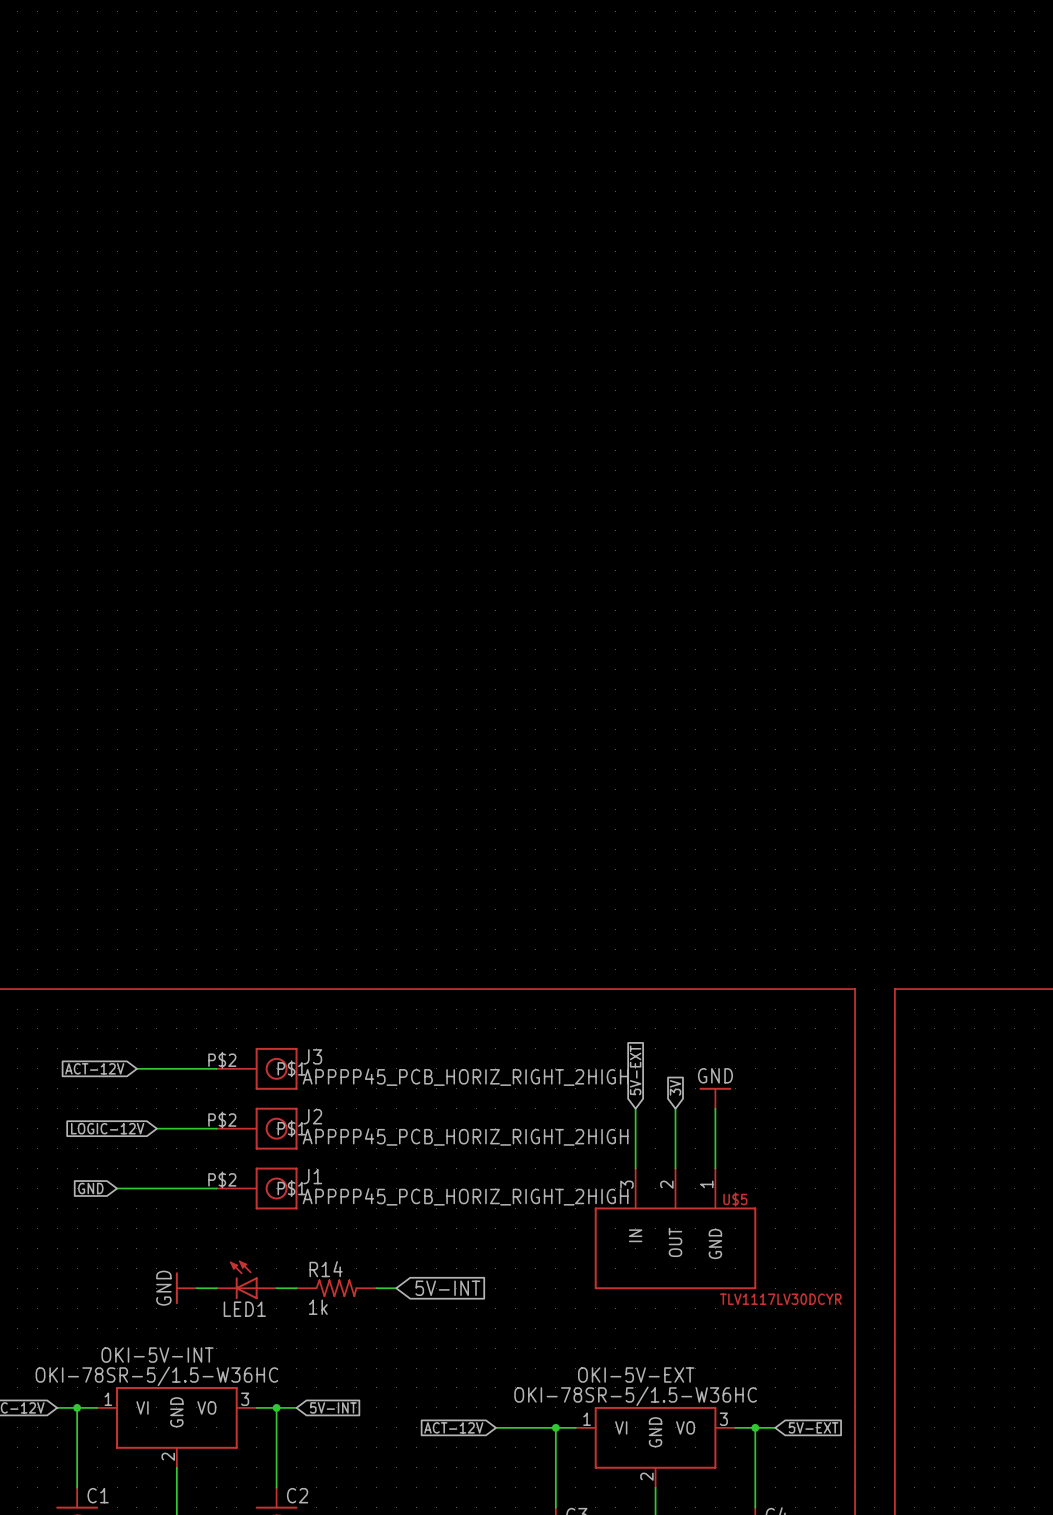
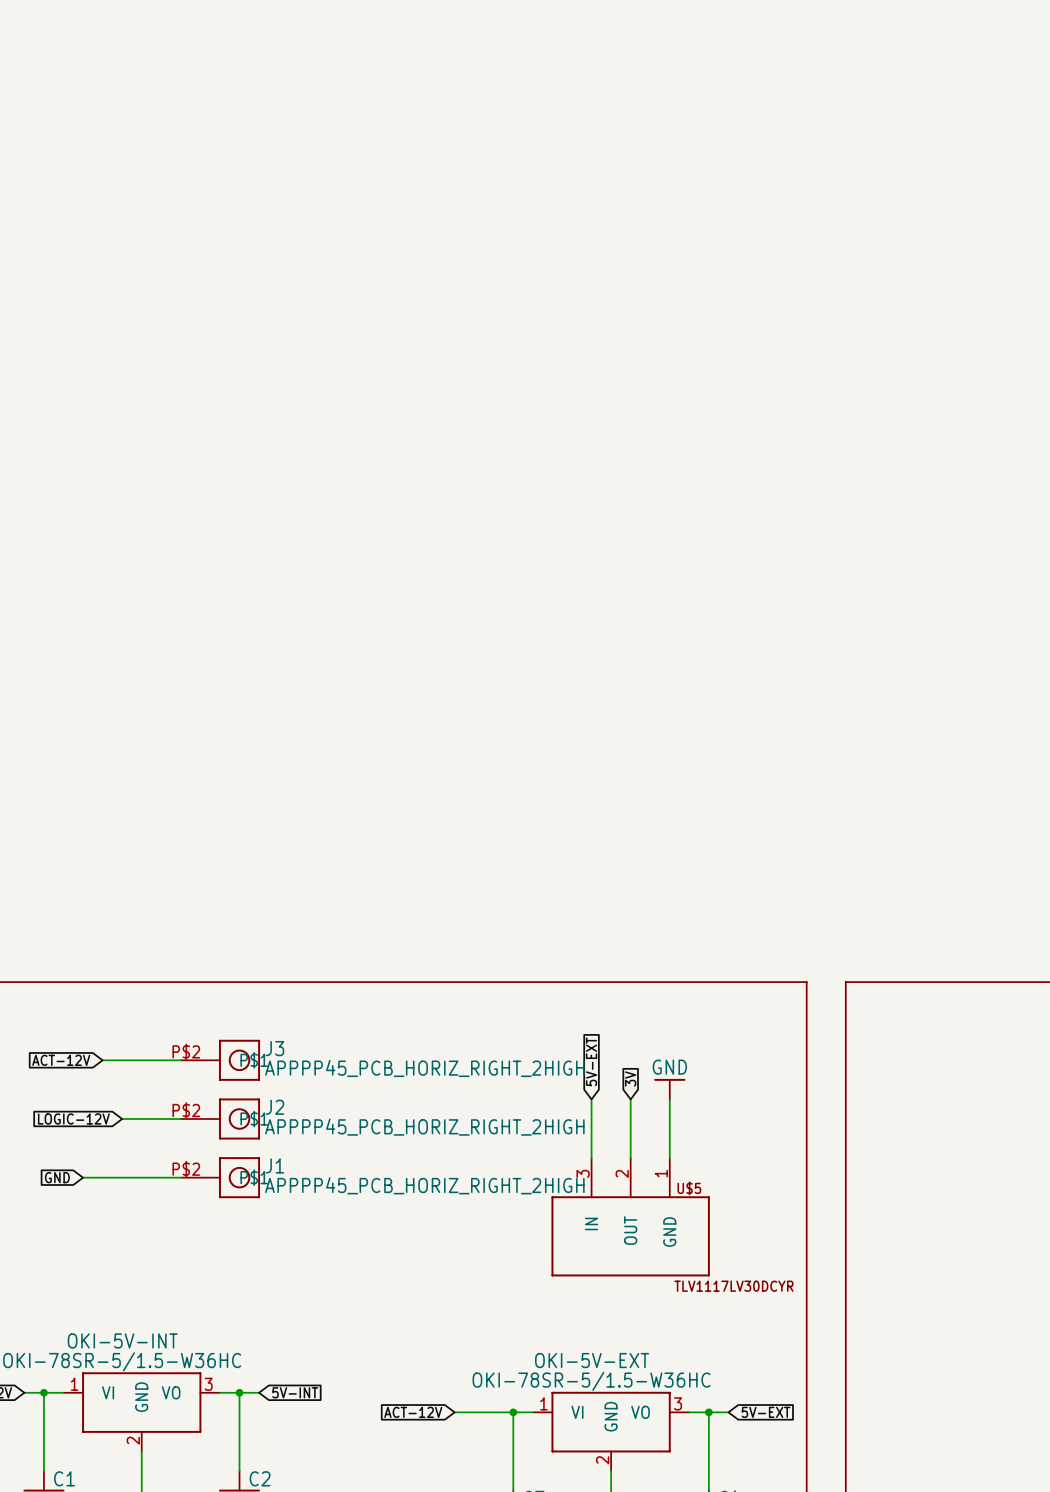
LED1: (246, 1279) -> none
power symbol: GND (186, 1288) -> none
wire: (196, 1288) (216, 1288) -> none
wire: (276, 1288) (296, 1288) -> none
R14: 1k (336, 1288) -> none
wire: (376, 1288) (396, 1288) -> none
global label: 5V-INT (447, 1288) -> none

